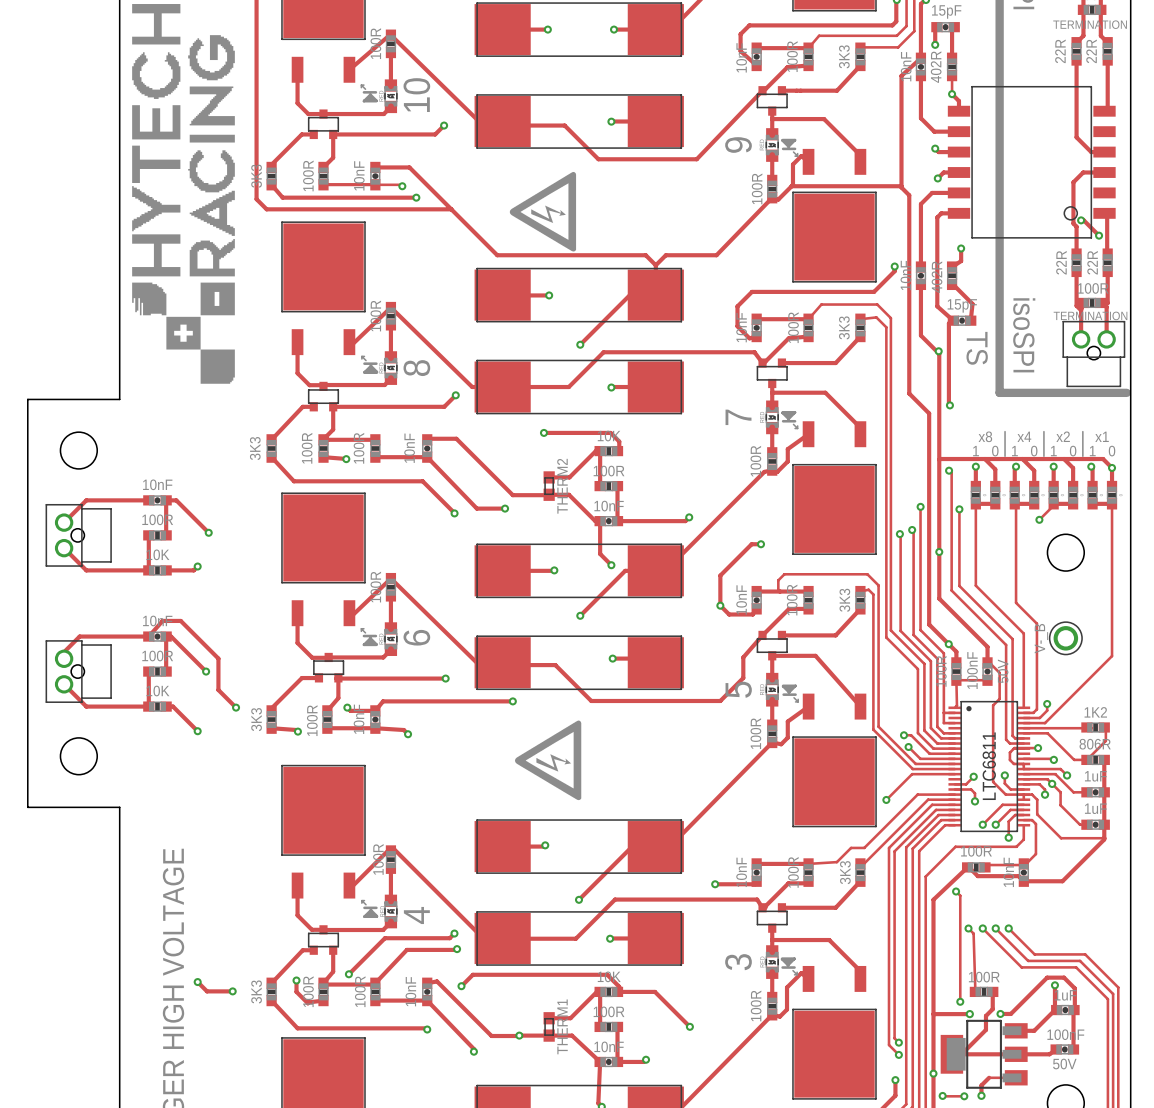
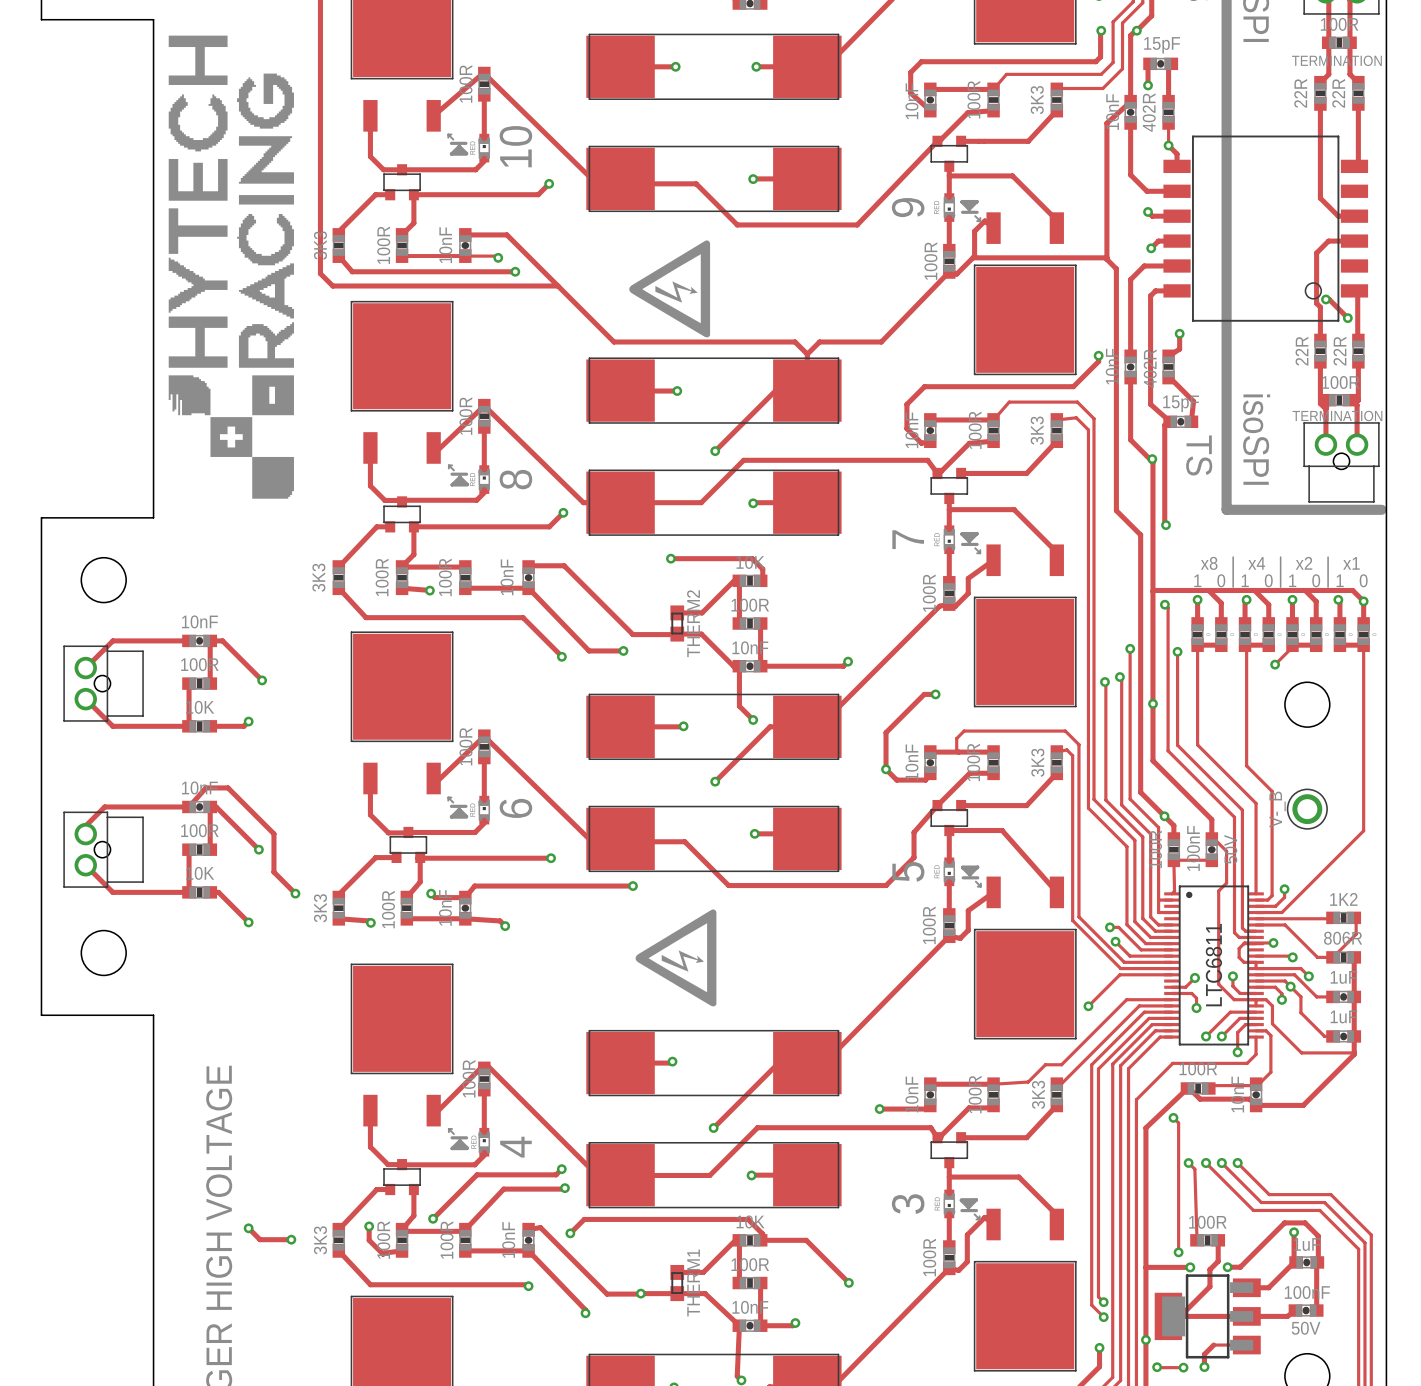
part footprint: [384, 79, 398, 114] -> [478, 133, 490, 163]
part footprint: [765, 128, 779, 162] -> [943, 193, 955, 222]
part footprint: [384, 351, 398, 385] -> [478, 465, 490, 494]
part footprint: [765, 400, 779, 435] -> [943, 525, 955, 555]
part footprint: [384, 622, 398, 656] -> [478, 795, 490, 825]
part footprint: [765, 672, 779, 707] -> [943, 857, 955, 887]
part footprint: [384, 894, 398, 929] -> [478, 1127, 490, 1157]
part footprint: [765, 945, 779, 979] -> [943, 1189, 955, 1219]

